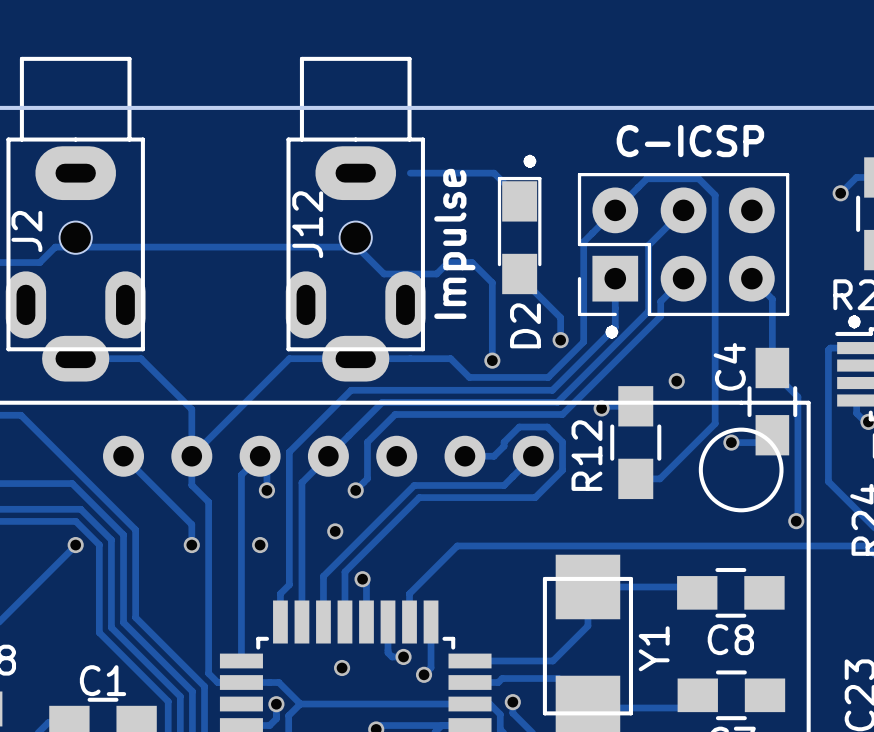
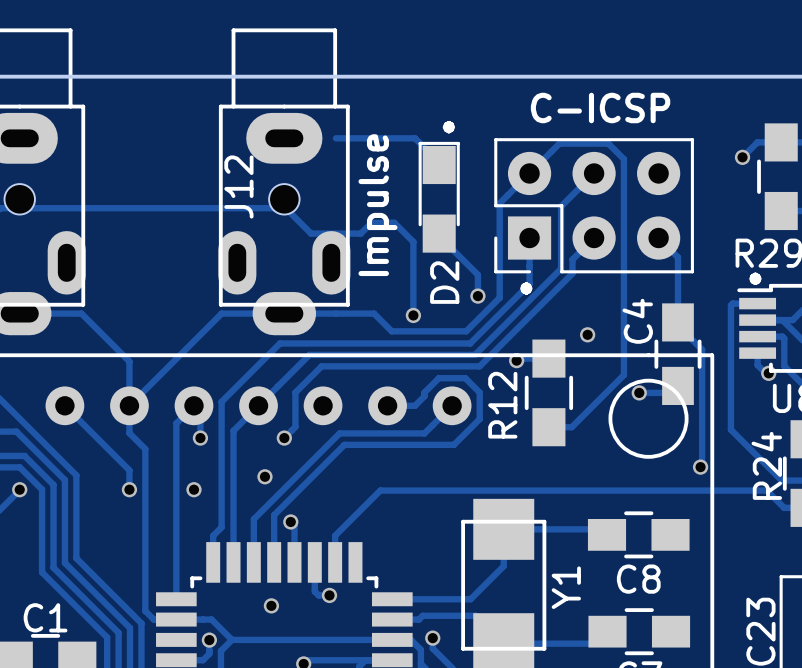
track: (431, 622) (431, 667) (424, 674) -> none
via: (424, 674) -> none

